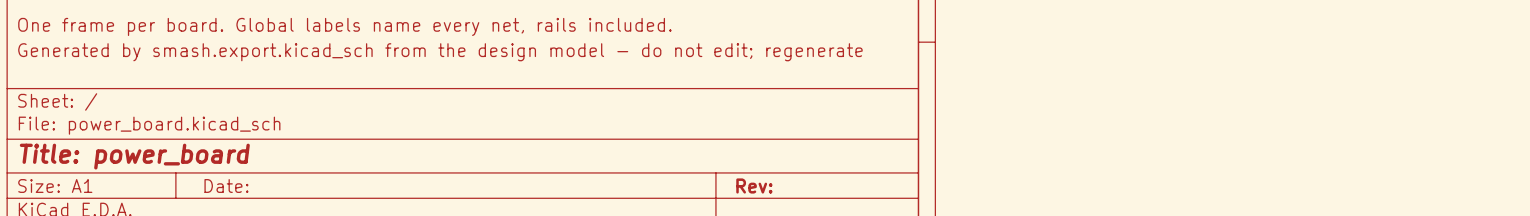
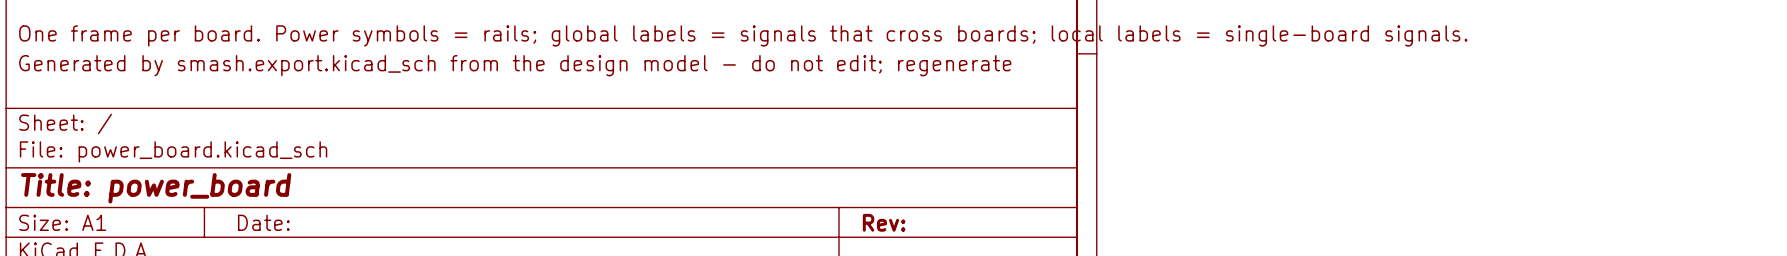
title block: One frame per board. Global labels name every net, rails included. (344, 26) -> One frame per board. Power symbols = rails; global labels = signals that cross boards; local labels = single-board signals. (743, 35)

